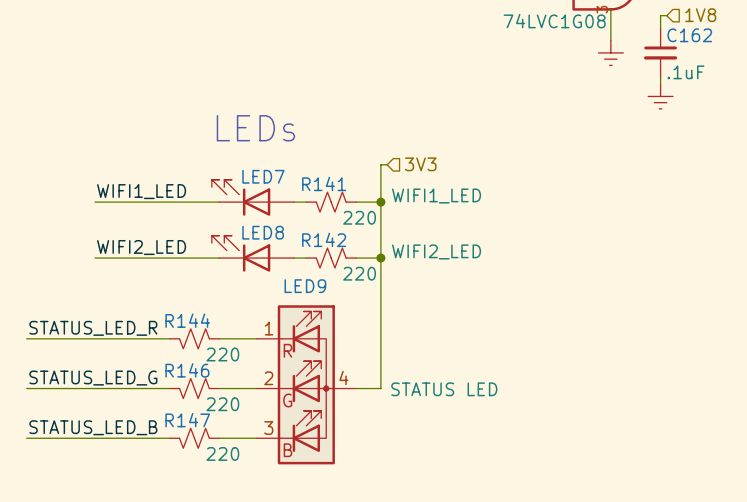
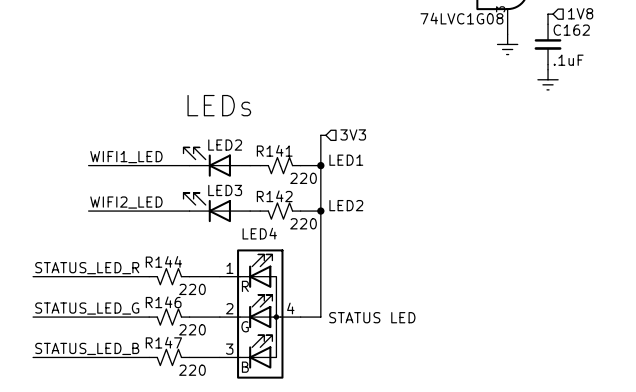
LED7 name: LED7 (263, 176) -> LED2 (225, 145)
LED7 value: WIFI1_LED (436, 196) -> LED1 (346, 160)
LED8 name: LED8 (263, 232) -> LED3 (225, 190)
LED8 value: WIFI2_LED (436, 251) -> LED2 (346, 205)
LED9 name: LED9 (305, 286) -> LED4 (259, 233)

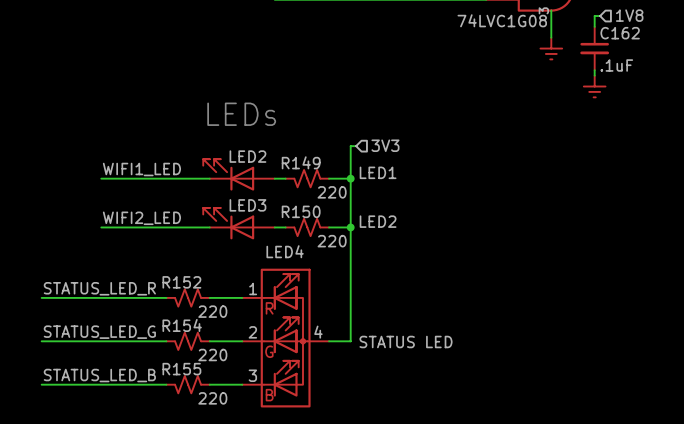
R141 name: R141 (274, 150) -> R149 (301, 162)
R142 name: R142 (274, 196) -> R150 (301, 211)
R144 name: R144 (163, 261) -> R152 (181, 282)
R146 name: R146 (163, 302) -> R154 (182, 325)
R147 name: R147 (163, 342) -> R155 (181, 369)

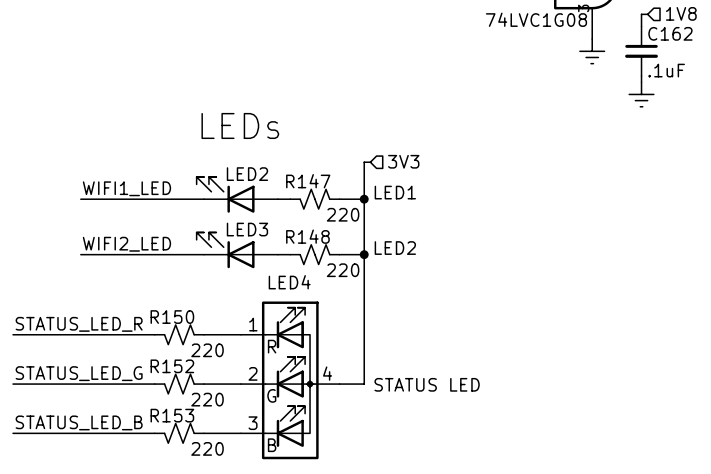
R149 name: R149 (301, 162) -> R147 (308, 181)
R150 name: R150 (301, 211) -> R148 (307, 236)
R152 name: R152 (181, 282) -> R150 (172, 317)
R154 name: R154 (182, 325) -> R152 (172, 366)
R155 name: R155 (181, 369) -> R153 (172, 415)

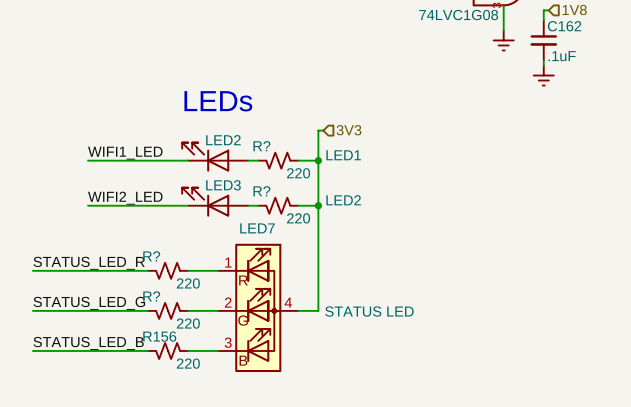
R147 name: R147 (308, 181) -> R? (261, 146)
R148 name: R148 (307, 236) -> R? (261, 191)
LED4 name: LED4 (289, 282) -> LED7 (257, 228)
R150 name: R150 (172, 317) -> R? (151, 256)
R152 name: R152 (172, 366) -> R? (151, 296)
R153 name: R153 (172, 415) -> R156 (159, 336)

